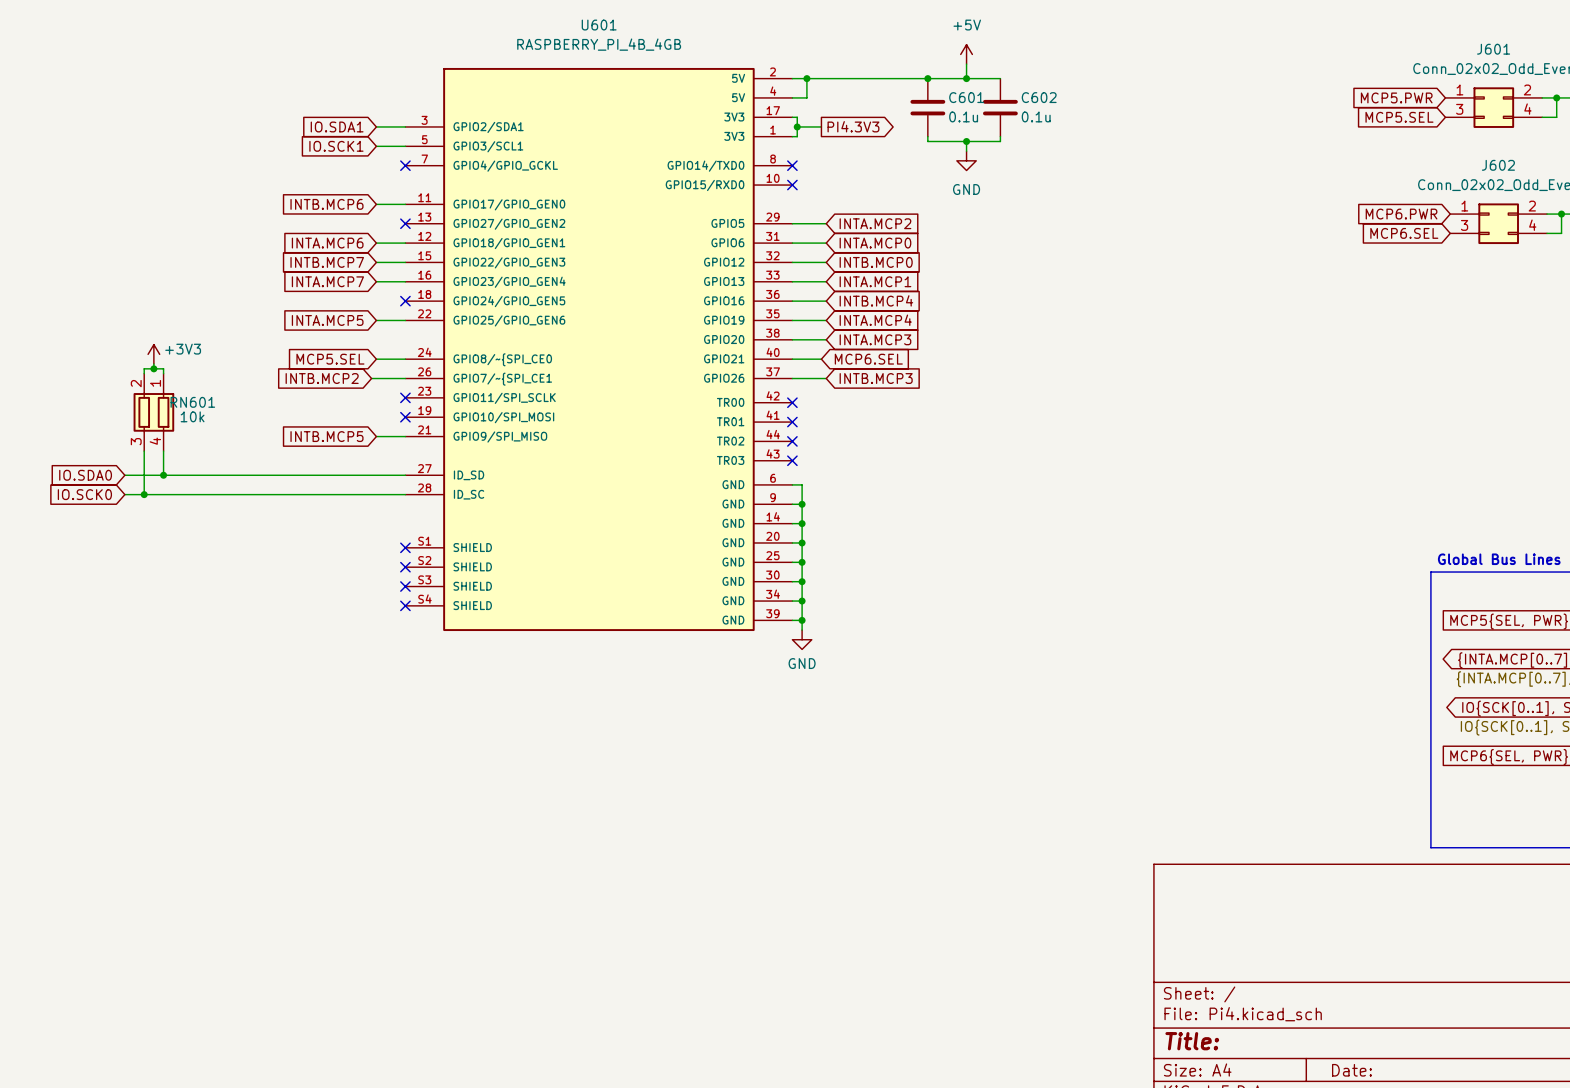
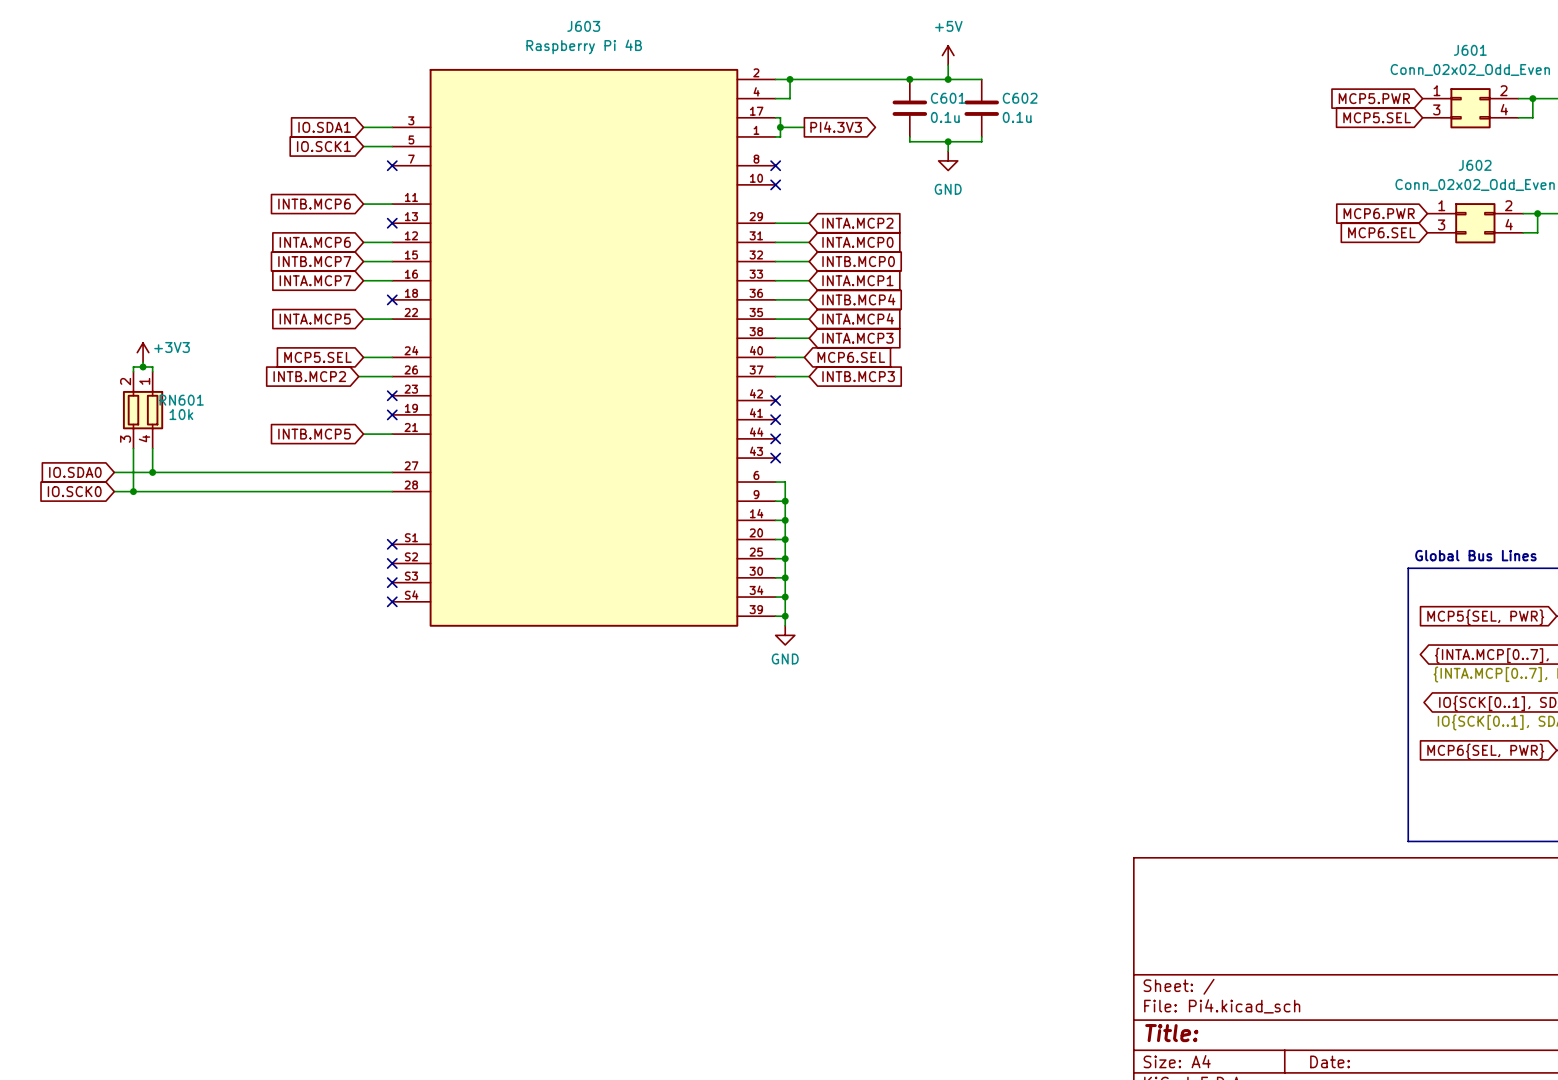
U601 name: U601 (599, 25) -> J603 (583, 26)
U601 value: RASPBERRY_PI_4B_4GB (599, 44) -> Raspberry Pi 4B (584, 46)
U601 symbol: [405, 67, 793, 632] -> [392, 68, 776, 627]

